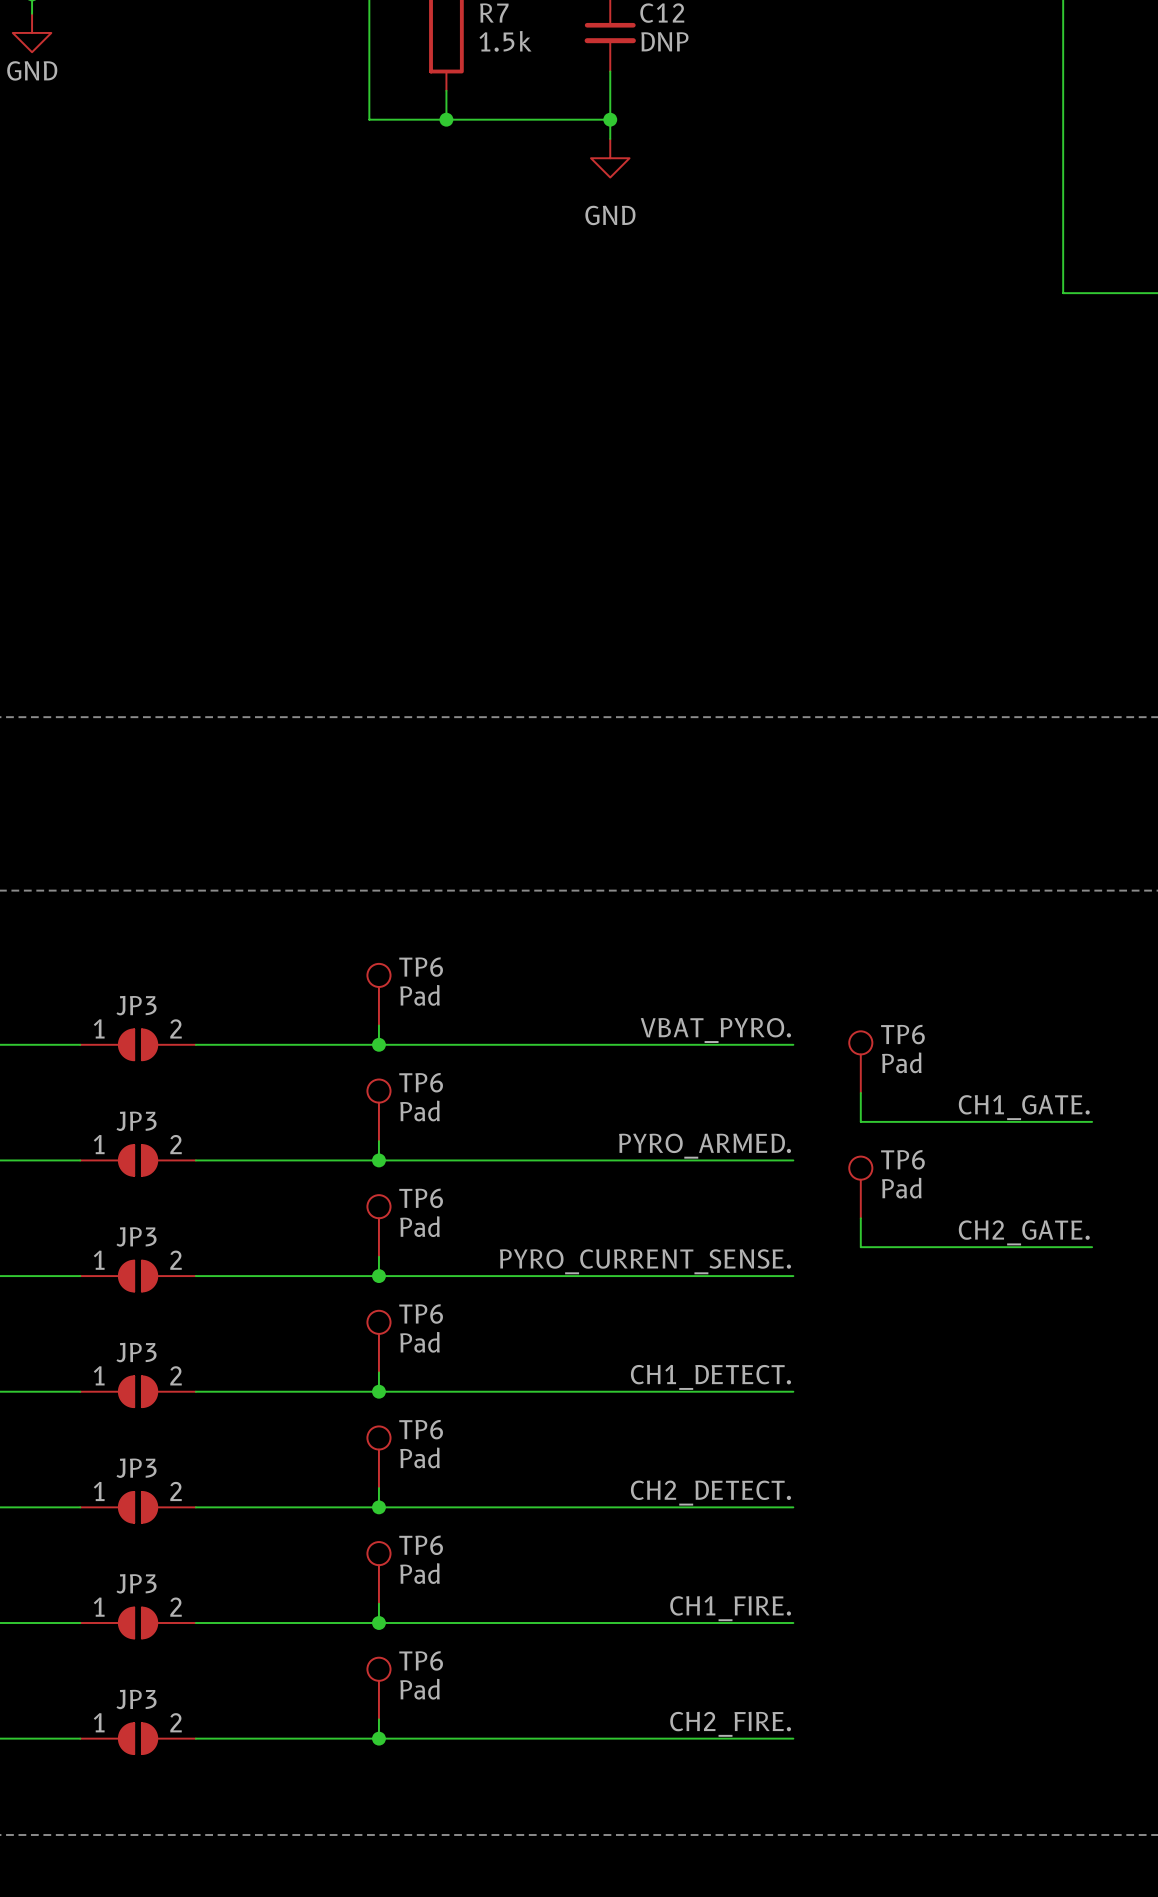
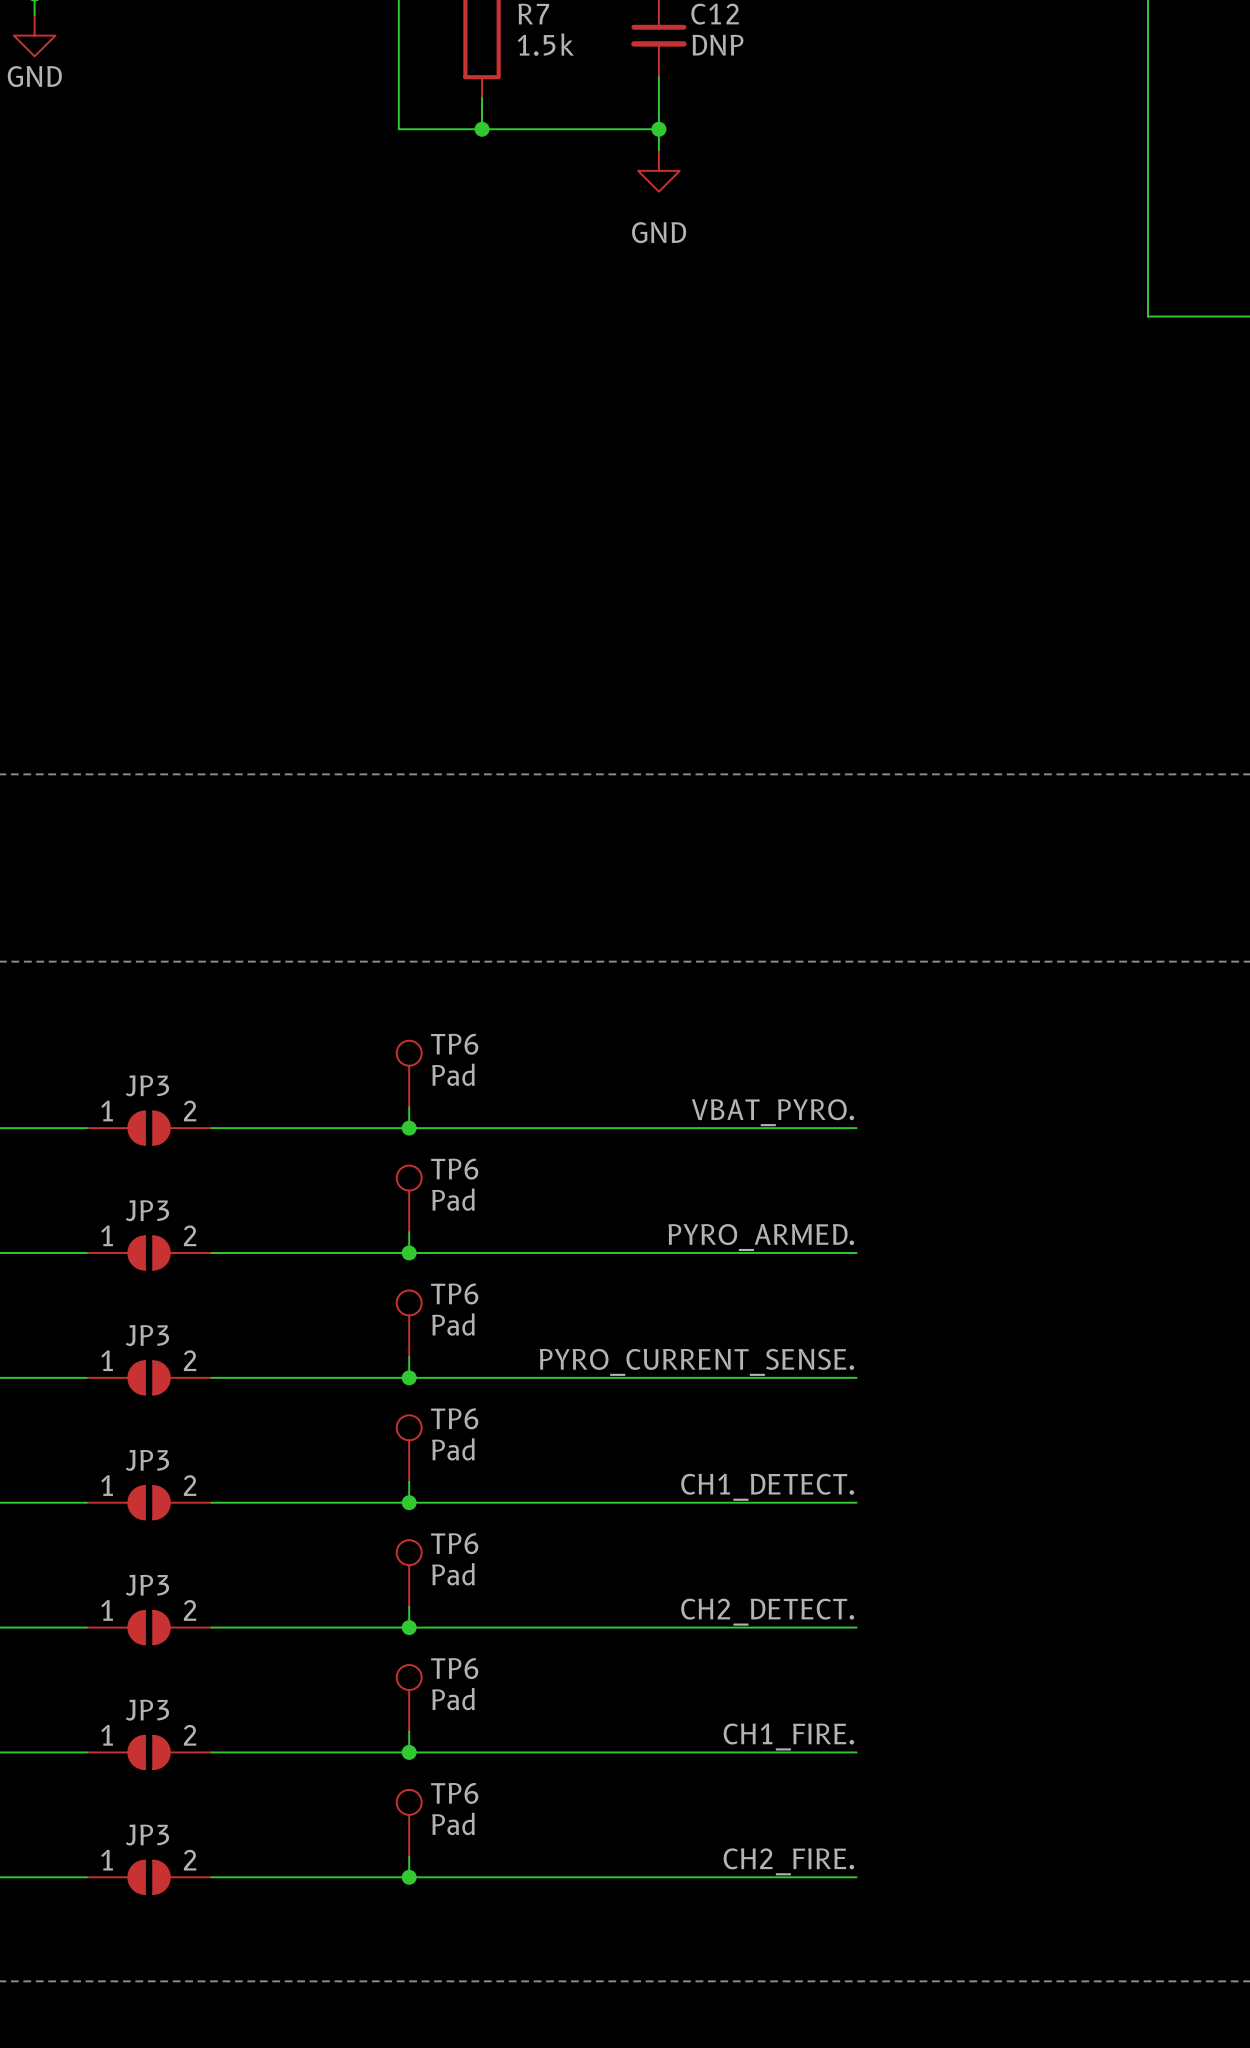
TP6: Pad (860, 1062) -> none
wire: (860, 1092) (860, 1121) (1092, 1121) -> none
label: CH1_GATE. (1024, 1107) -> none
TP6: Pad (860, 1187) -> none
wire: (860, 1218) (860, 1247) (1092, 1247) -> none
label: CH2_GATE. (1024, 1232) -> none

